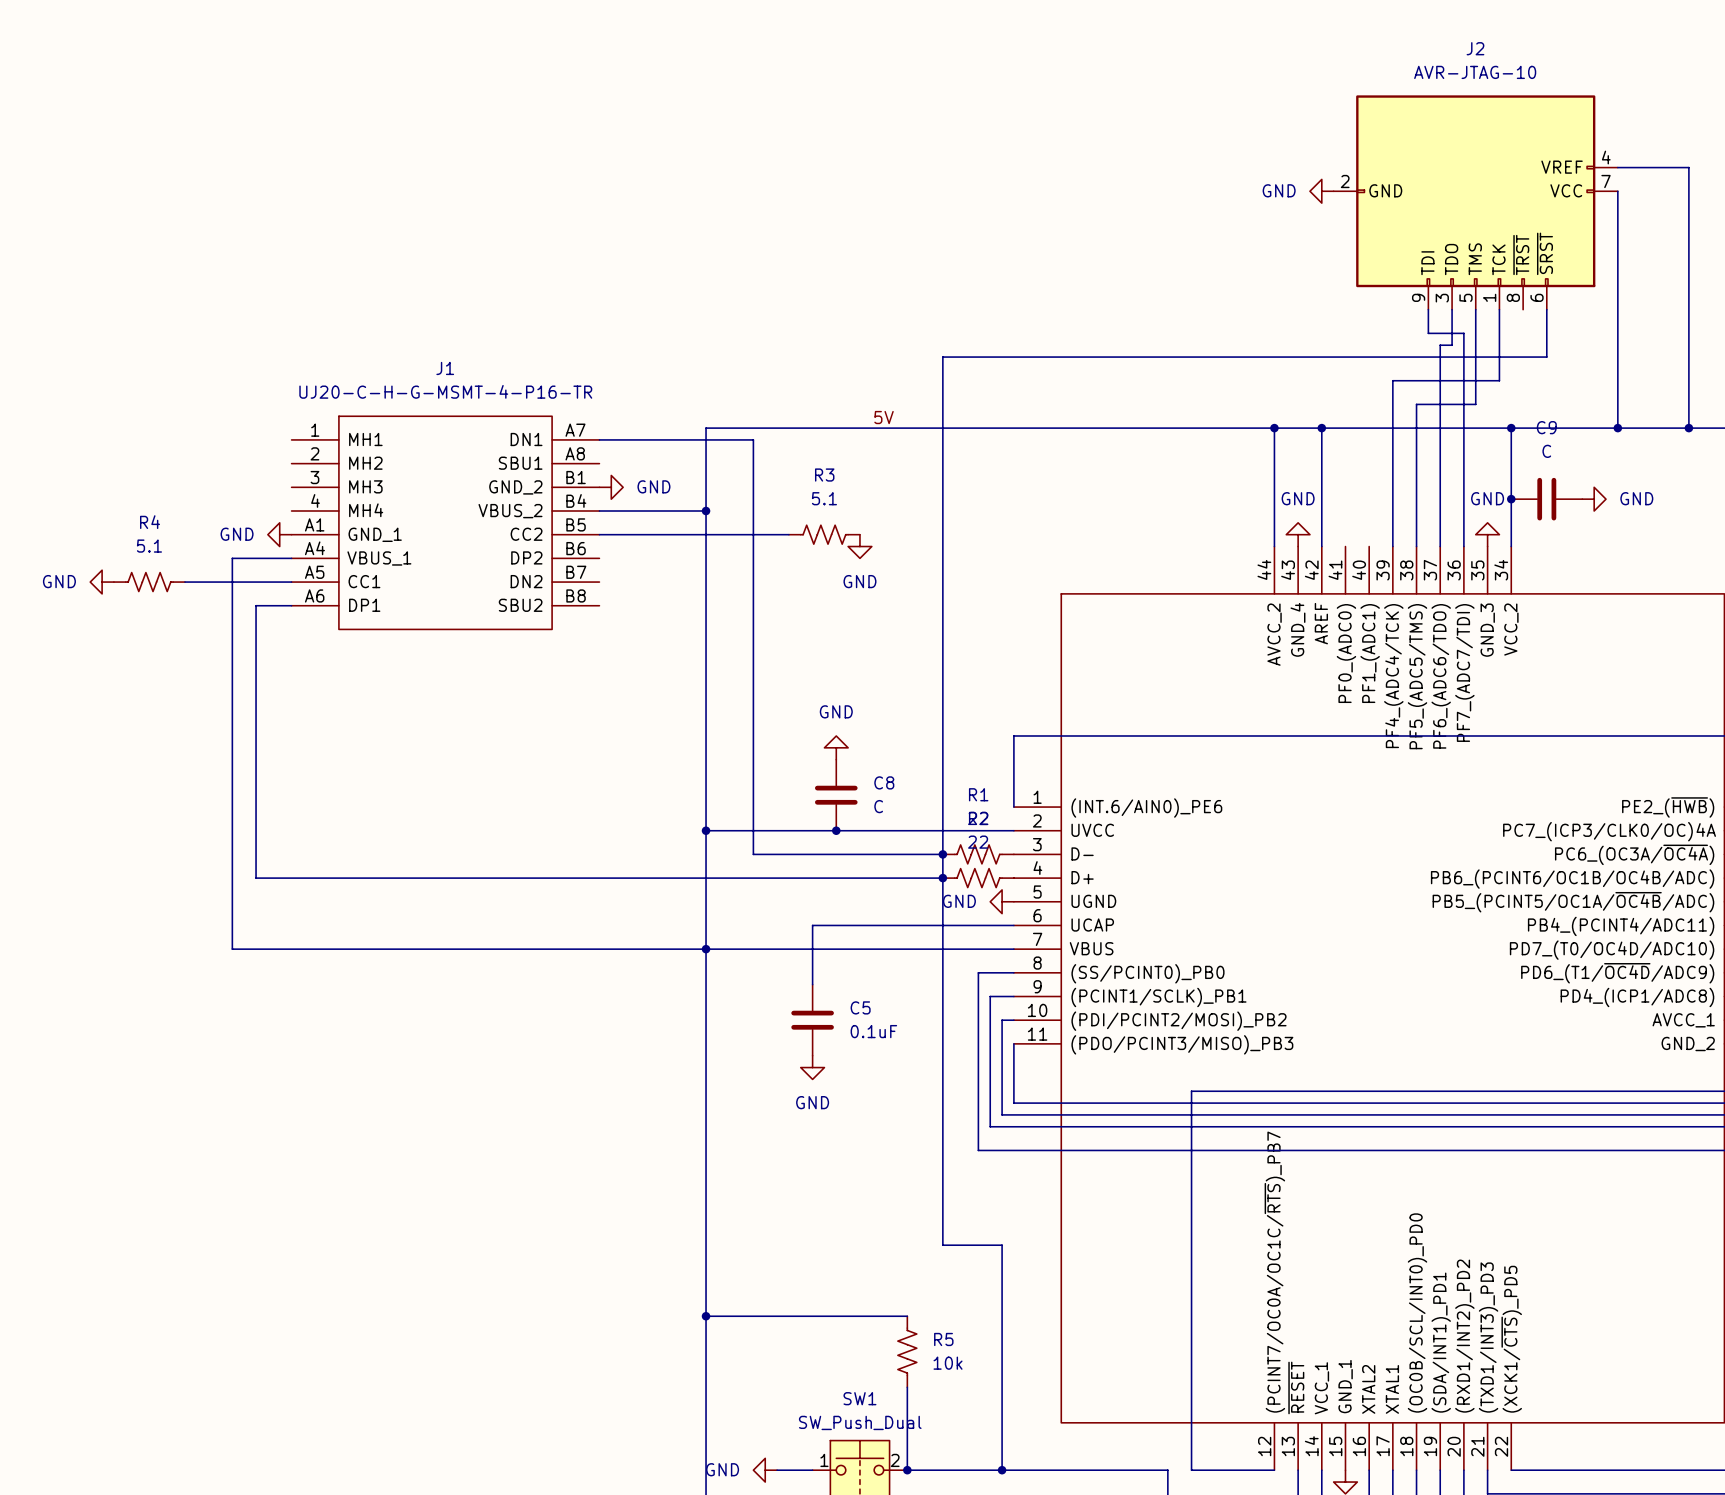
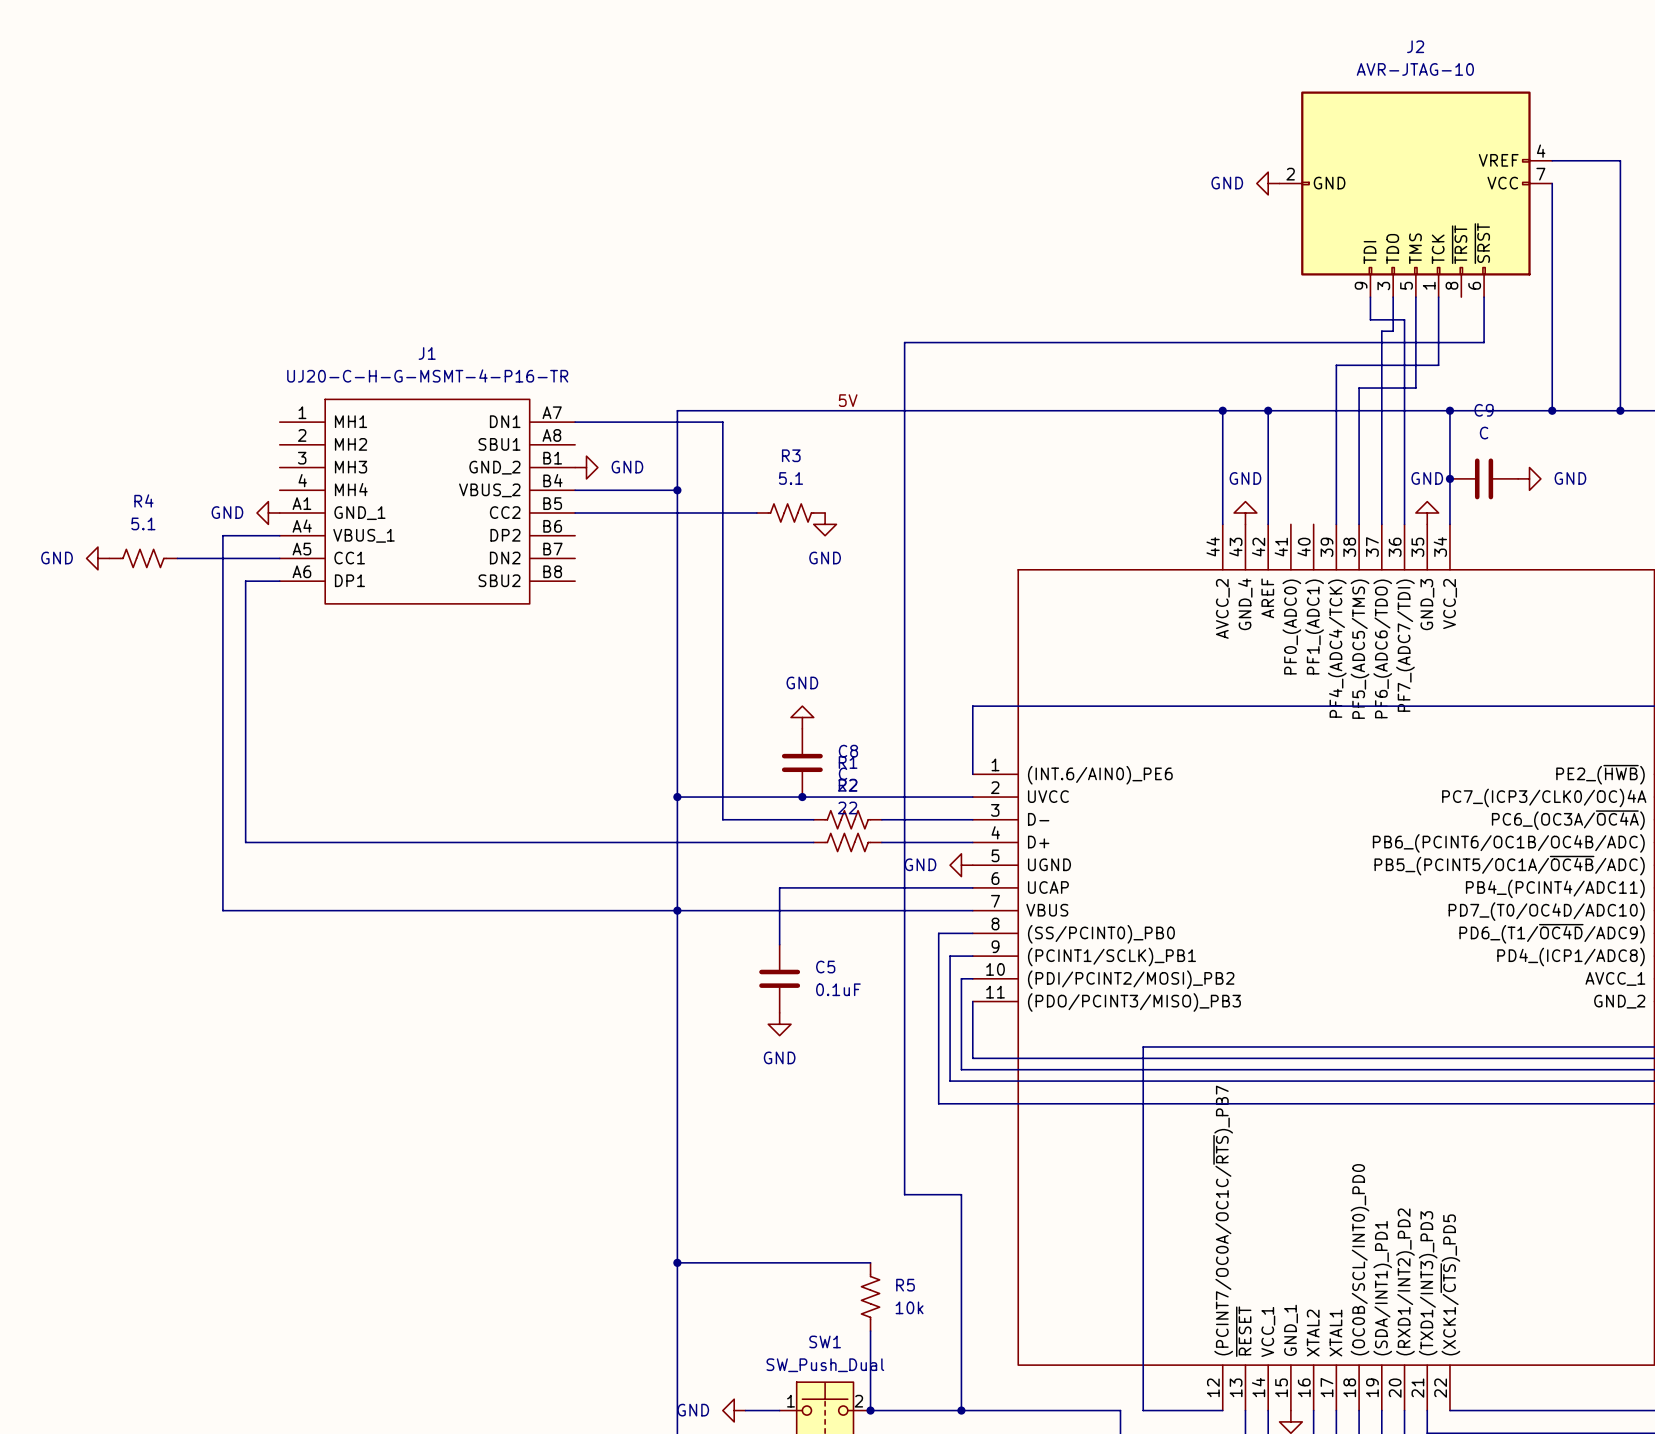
junction: (942, 854) -> none
R1 position: (978, 854) -> (847, 819)
junction: (942, 878) -> none
part position: (978, 878) -> (847, 842)

